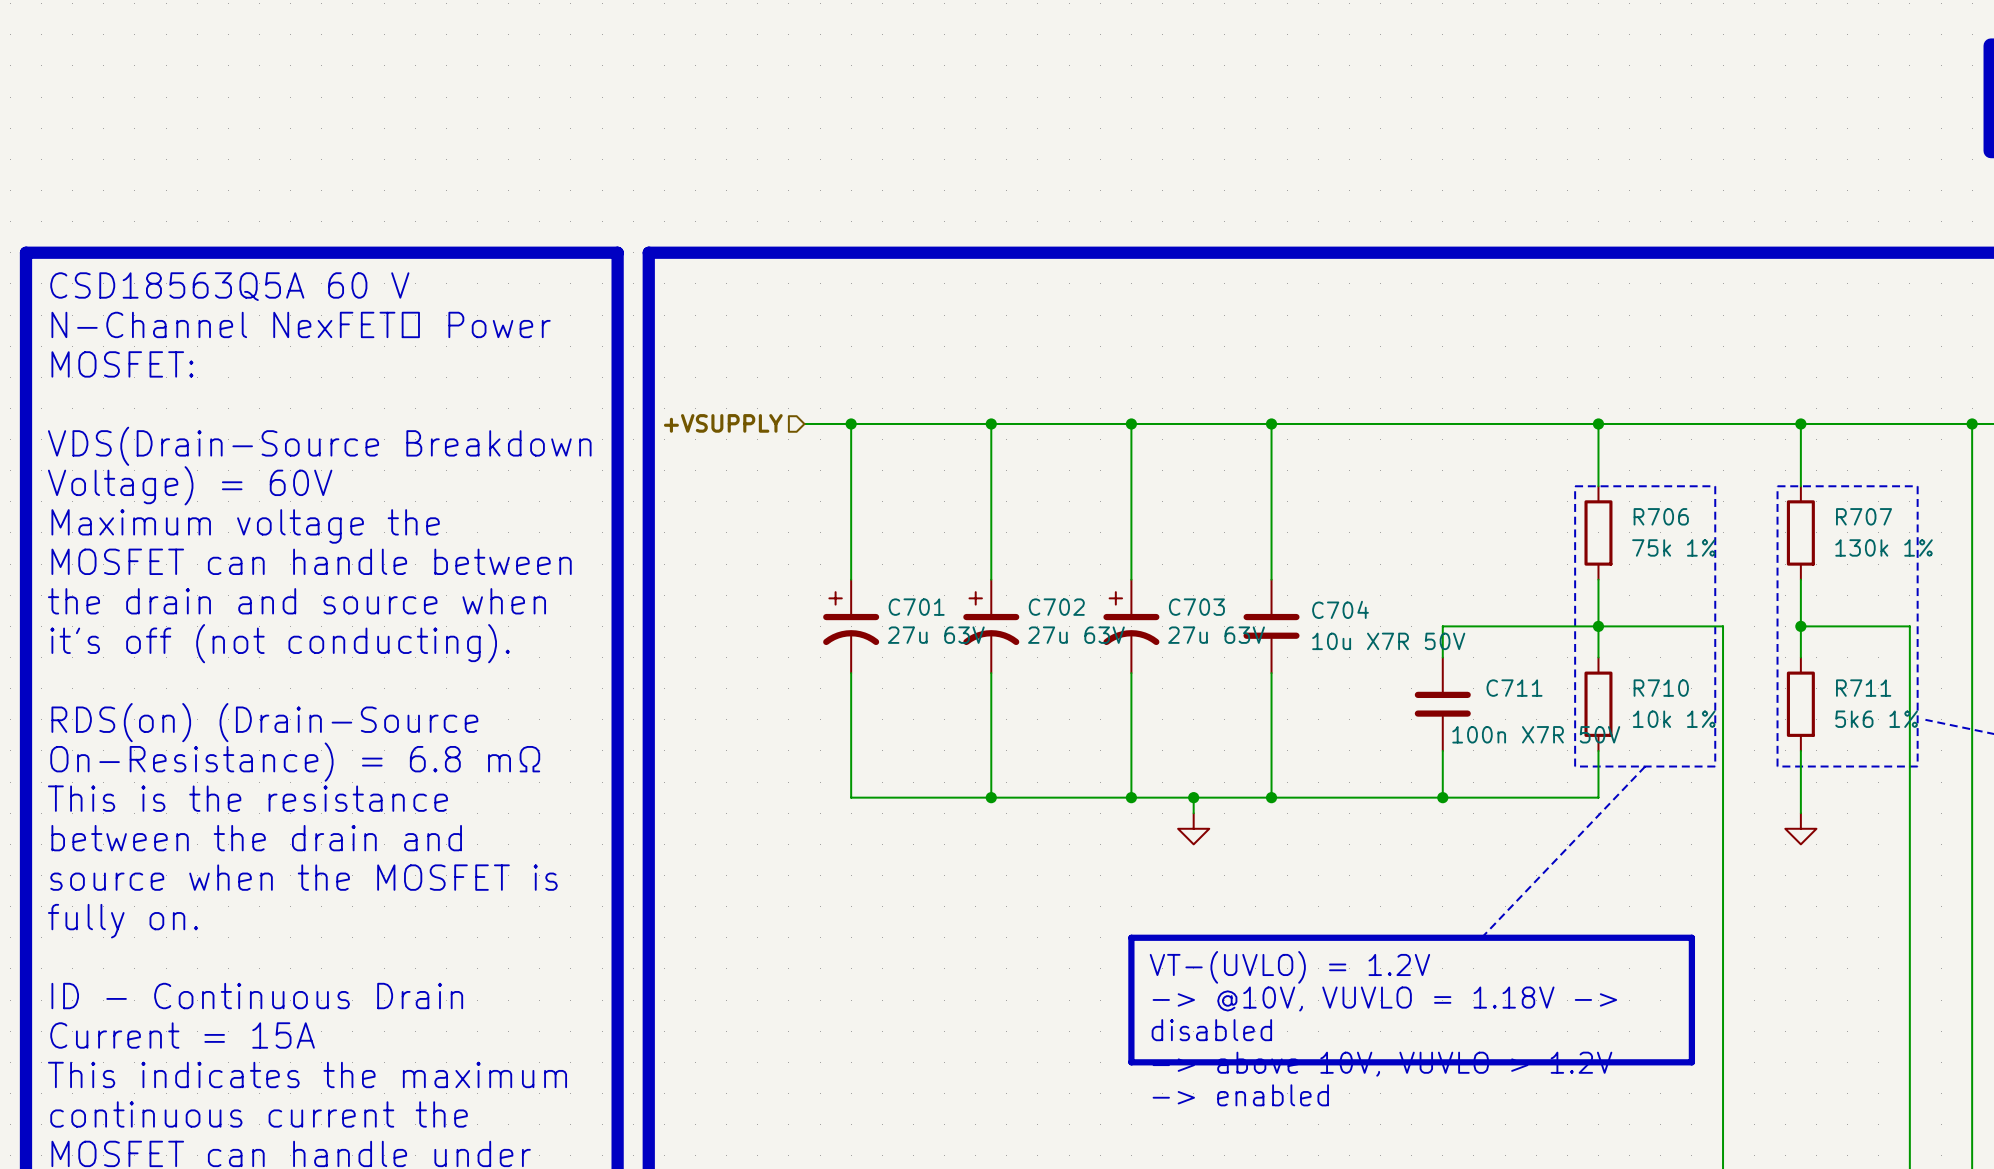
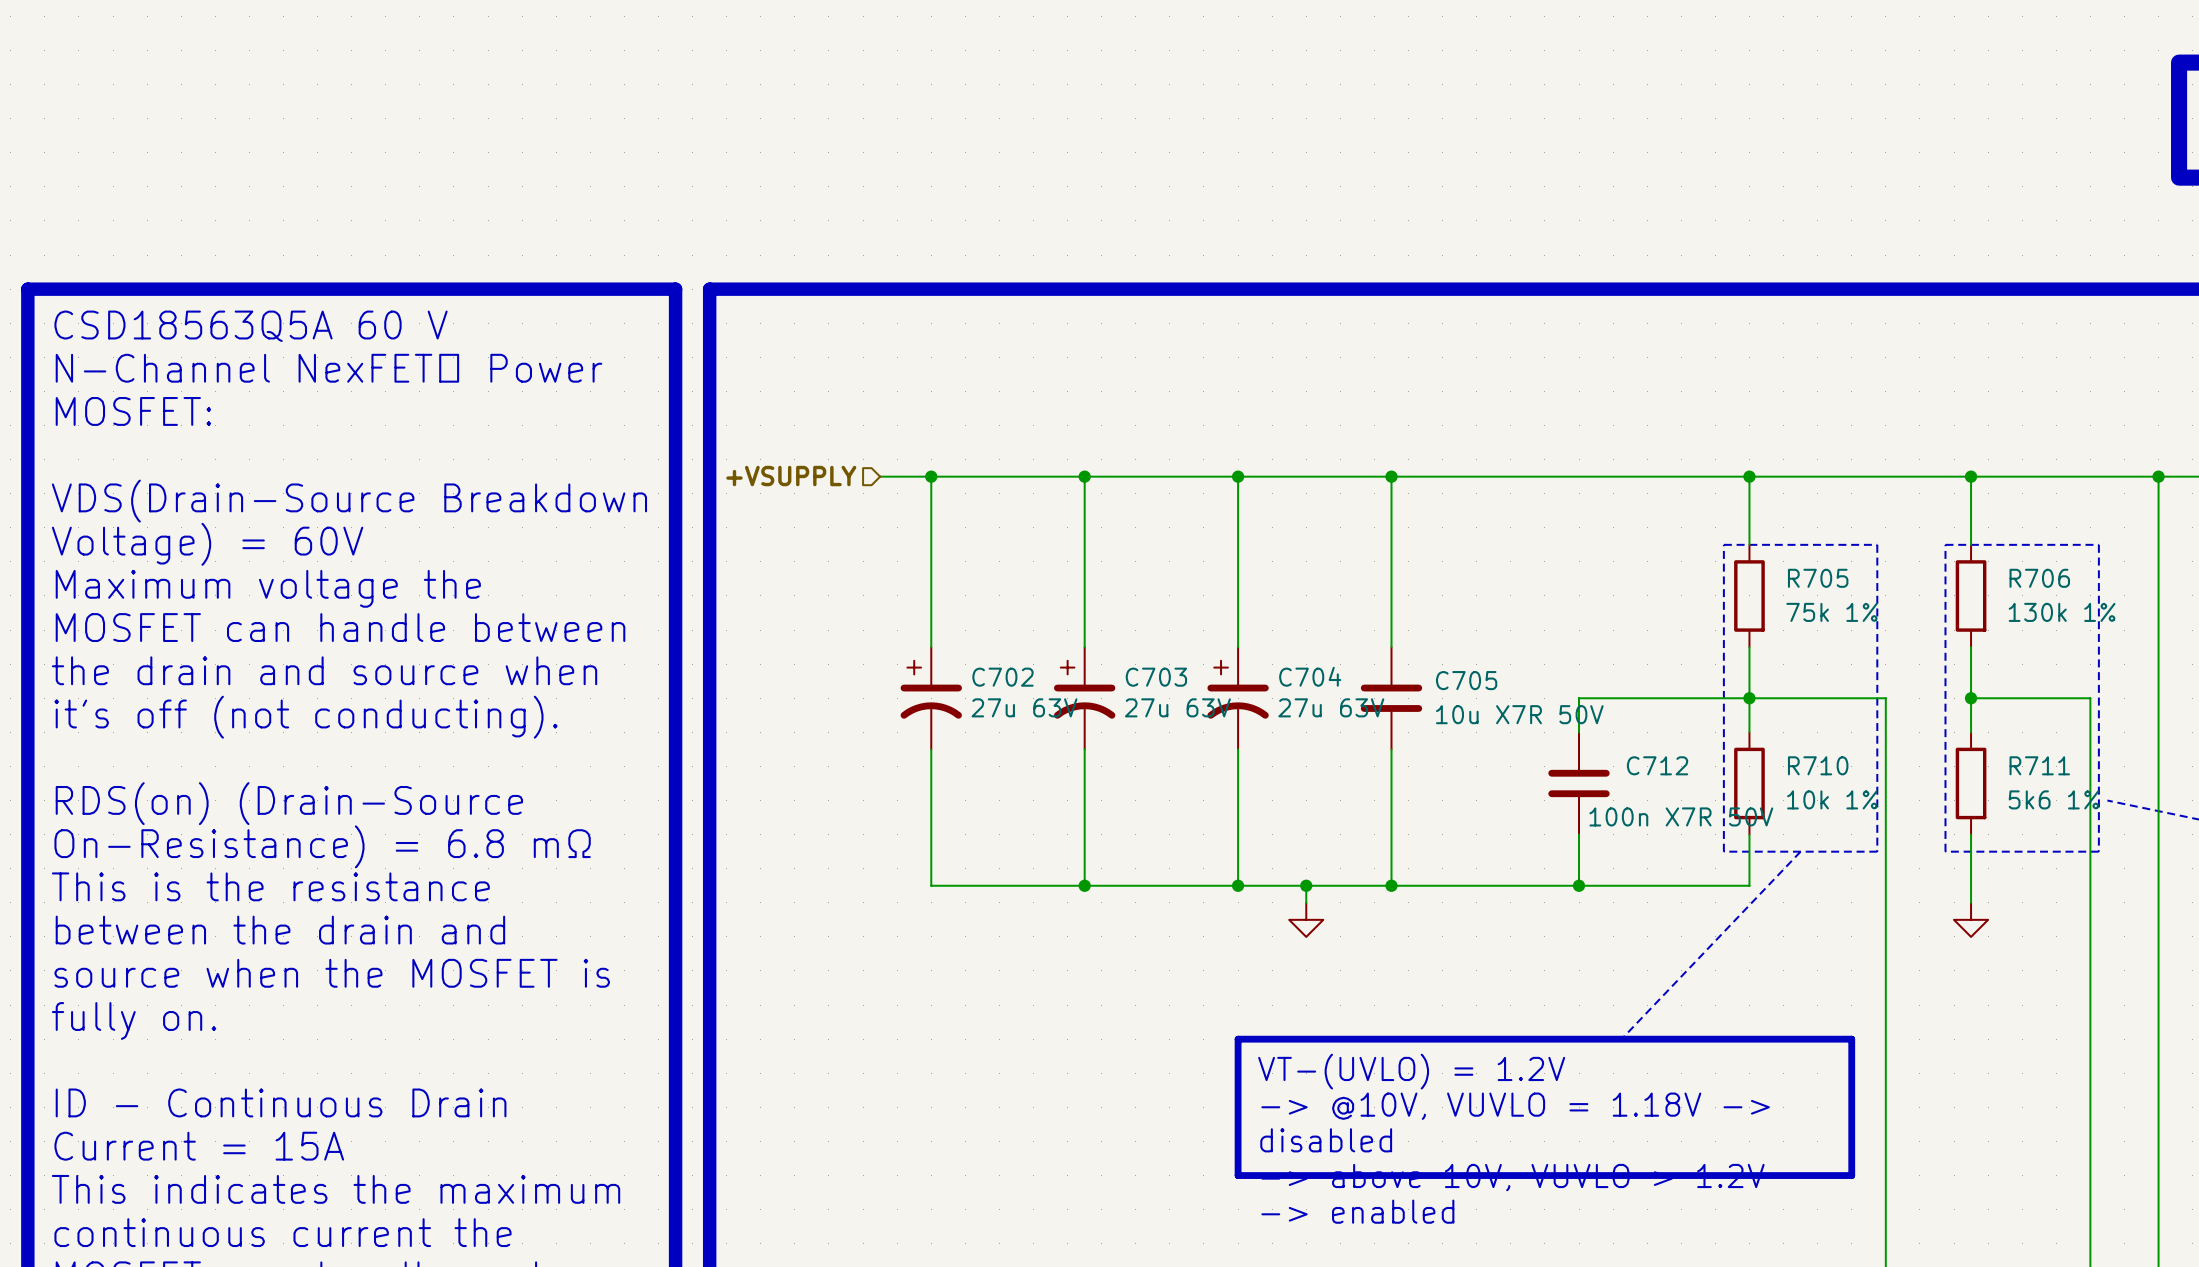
R706 name: R706 (1661, 516) -> R705 (1818, 578)
R707 name: R707 (1864, 516) -> R706 (2039, 578)
C701 name: C701 (916, 607) -> C702 (1002, 677)
C702 name: C702 (1056, 607) -> C703 (1156, 677)
C703 name: C703 (1196, 607) -> C704 (1310, 676)
C704 name: C704 (1340, 609) -> C705 (1466, 680)
C711 name: C711 (1514, 688) -> C712 (1657, 765)

